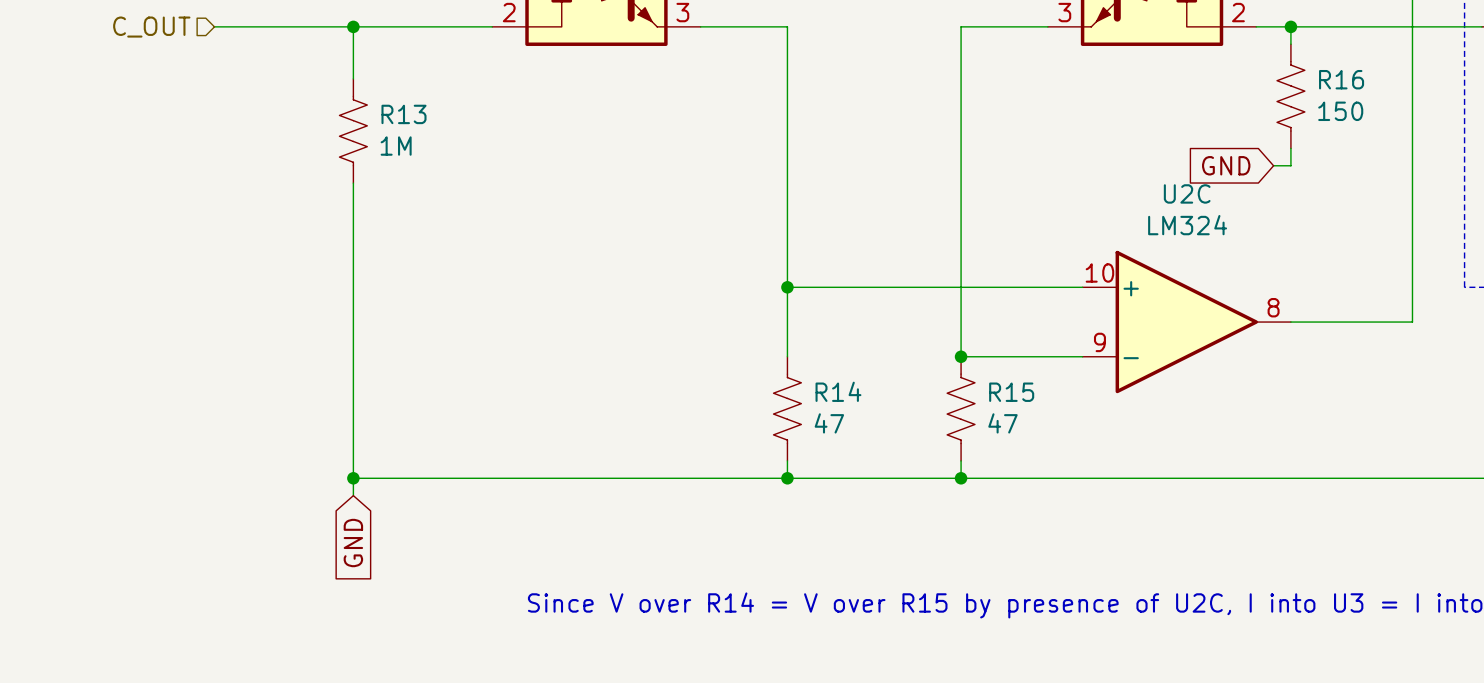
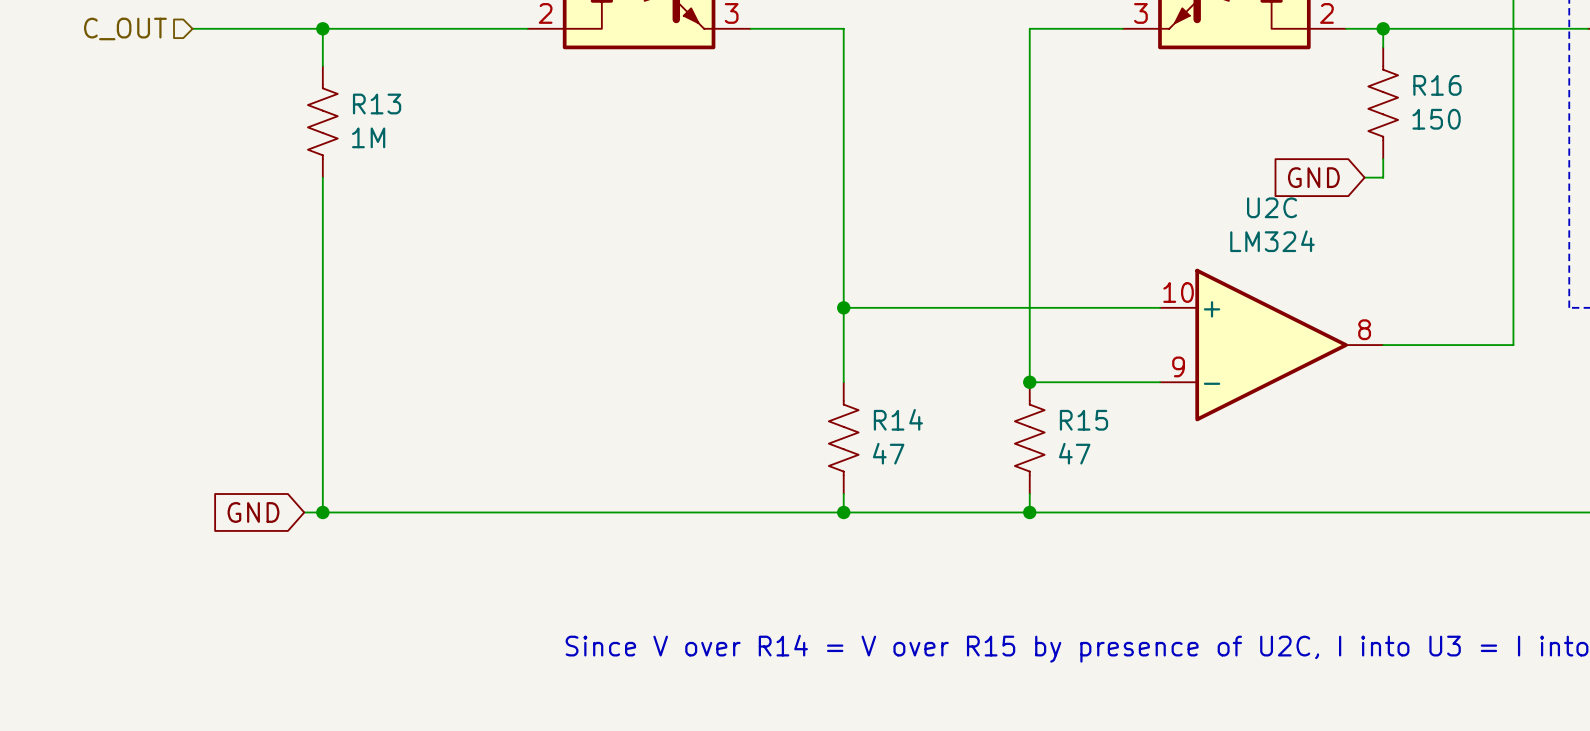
wire: none -> (192, 28) (229, 28)
wire: none -> (322, 28) (322, 66)
wire: (353, 26) (353, 78) -> none
junction position: (353, 26) -> (322, 28)
hierarchical label position: C_OUT (151, 27) -> C_OUT (125, 28)
R13 position: (353, 131) -> (322, 121)
wire: (353, 183) (353, 495) -> (322, 177) (322, 512)
wire: none -> (304, 512) (378, 512)
junction position: (353, 478) -> (322, 512)
global label rotation: 0° (353, 543) -> 90° clockwise (253, 512)
global label position: GND (353, 543) -> GND (253, 512)

